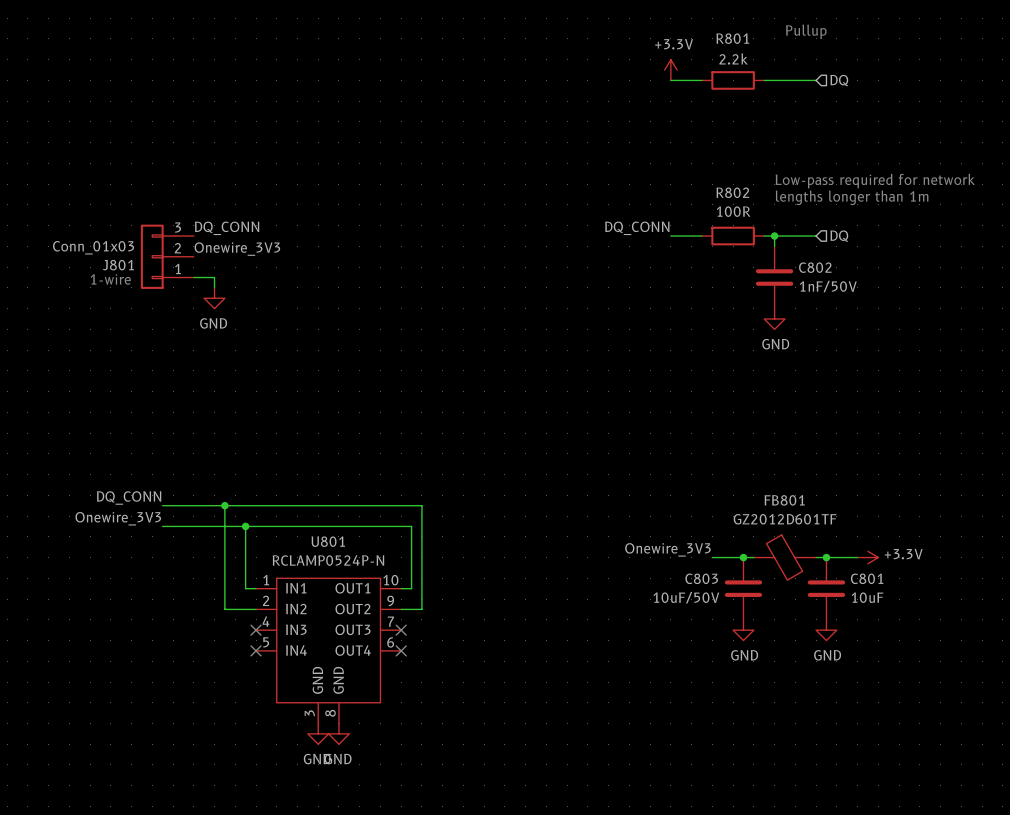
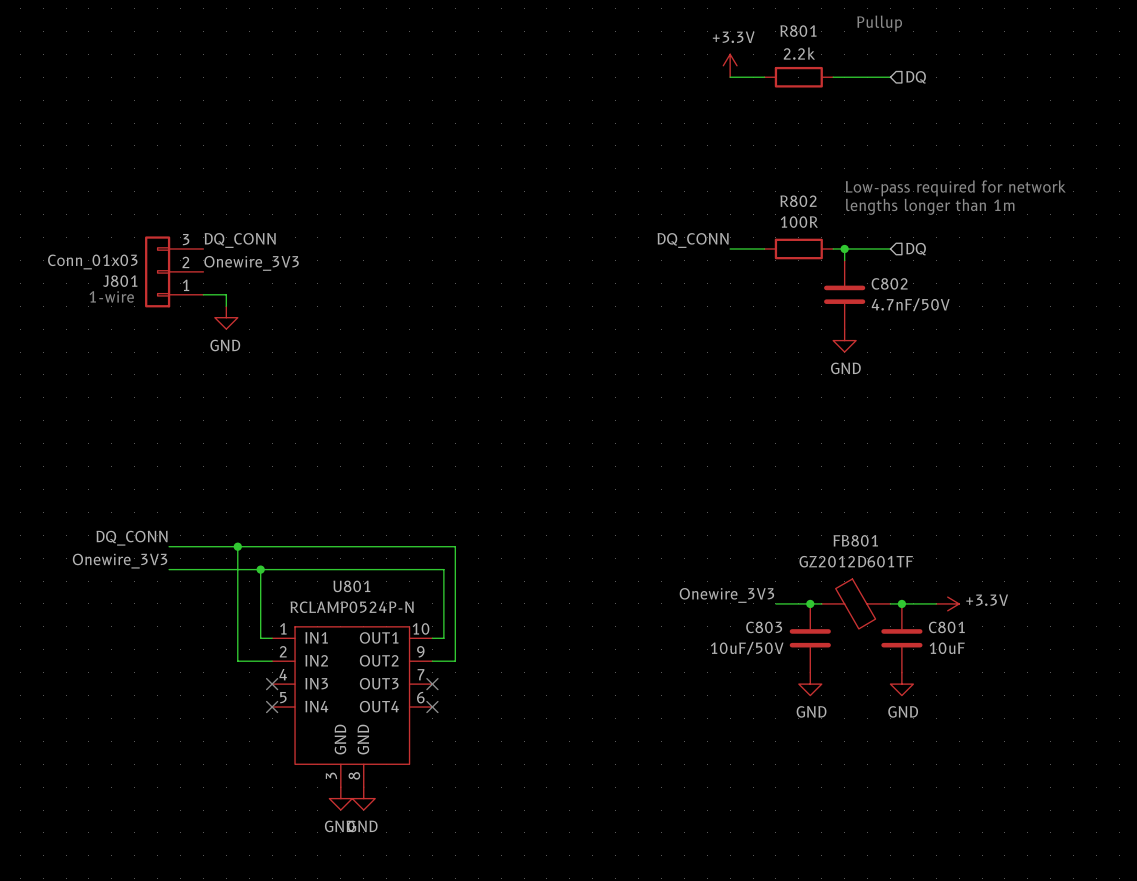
C802 value: 1nF/50V (828, 286) -> 4.7nF/50V (910, 304)

